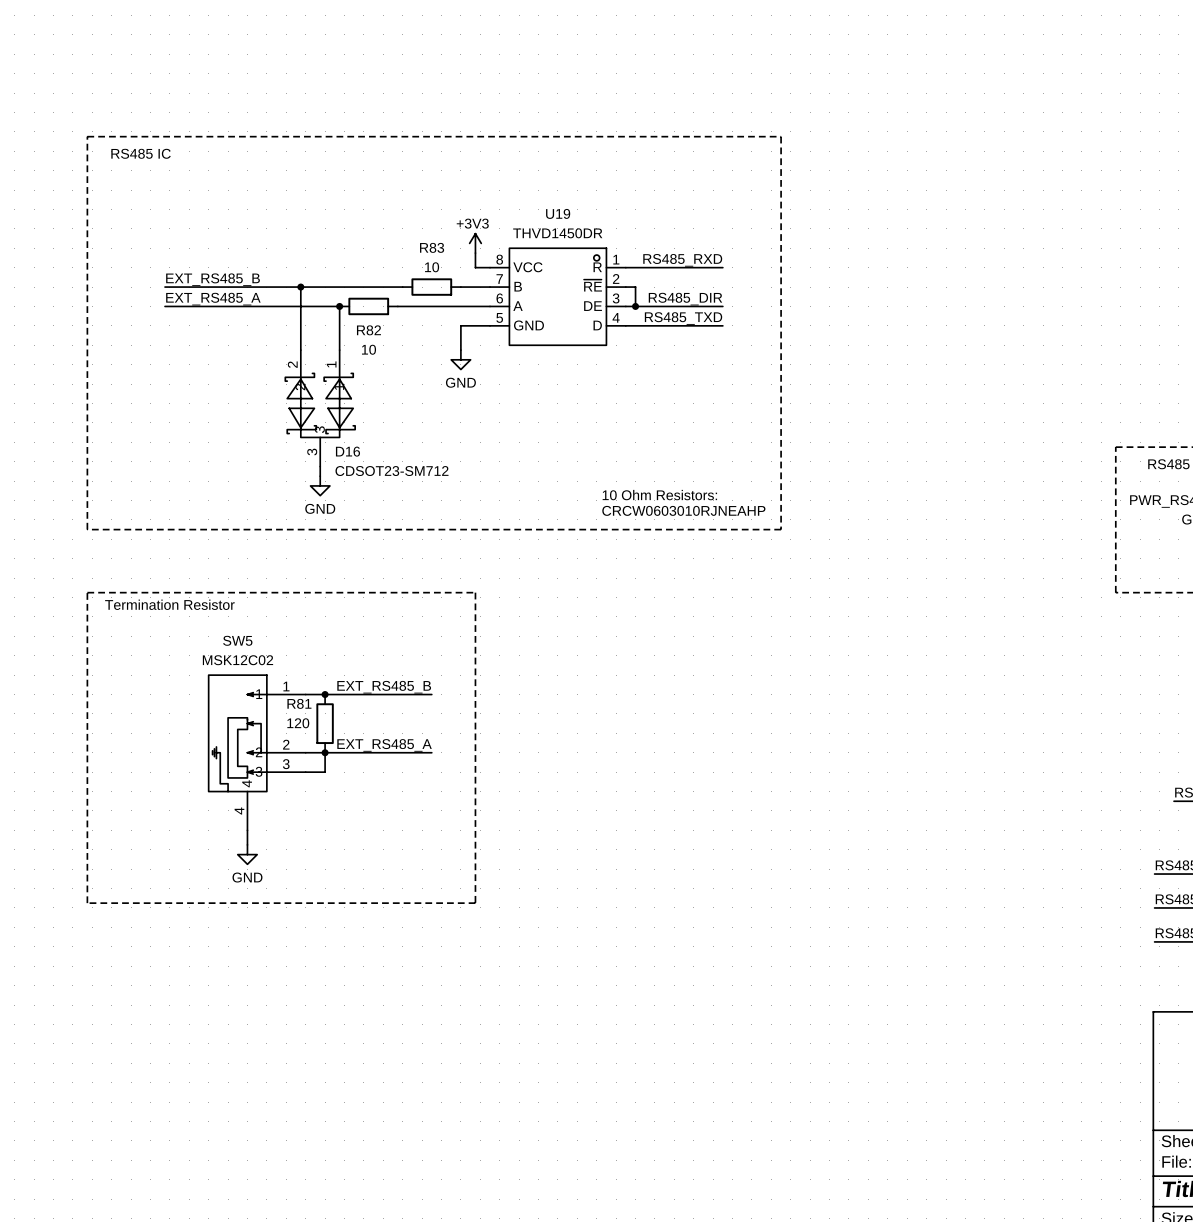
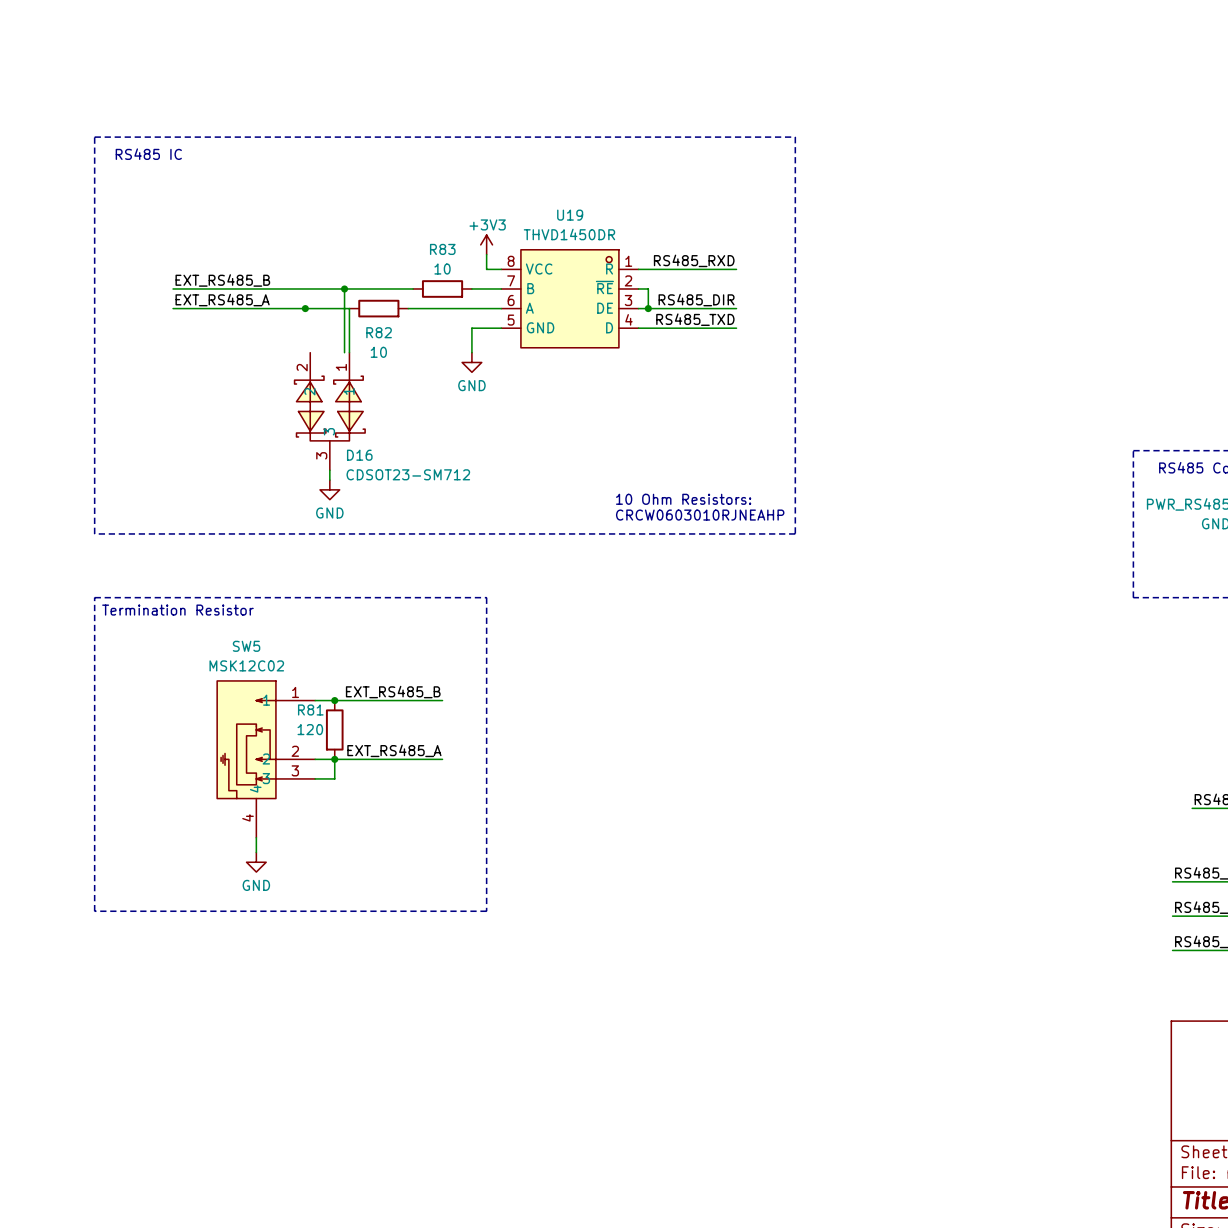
wire: (300, 287) (300, 350) -> (344, 288) (344, 352)
junction: (300, 287) -> none
junction: none -> (344, 288)
junction: none -> (305, 308)
junction: (339, 306) -> none

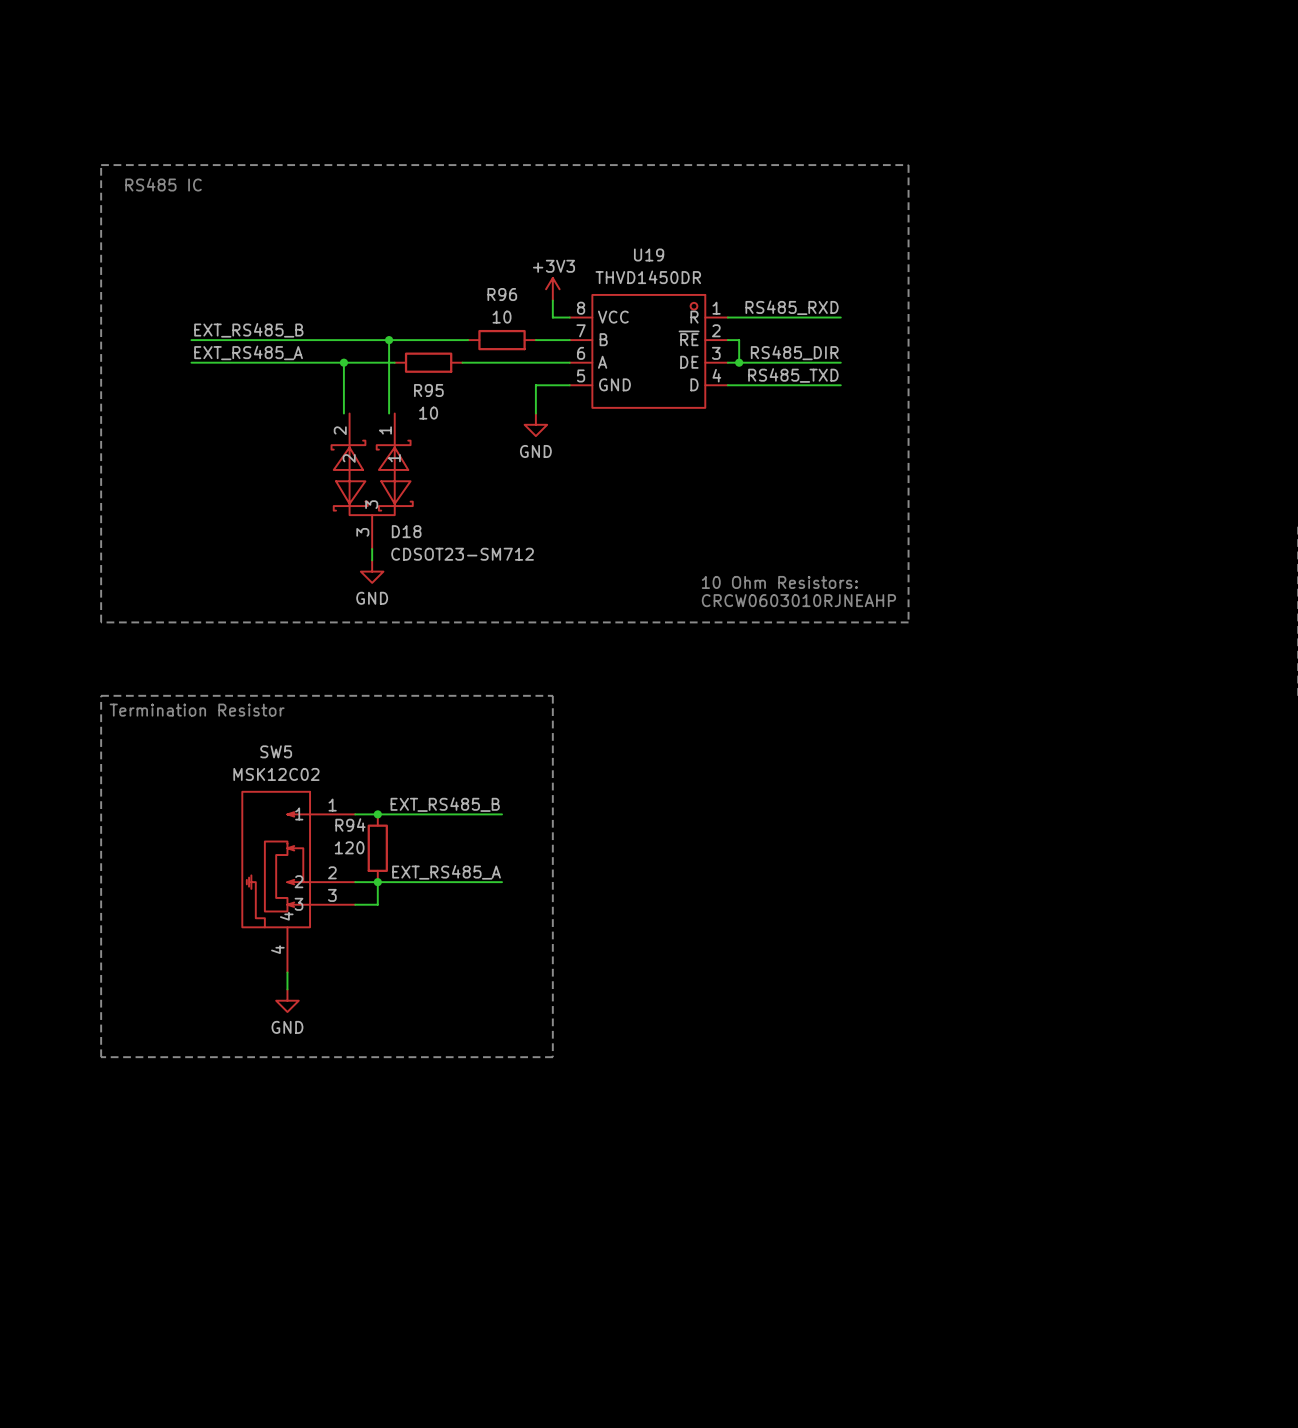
R83 name: R83 (442, 249) -> R96 (502, 294)
wire: (349, 308) (349, 352) -> (343, 362) (343, 413)
R82 name: R82 (379, 332) -> R95 (428, 390)
D16 name: D16 (359, 455) -> D18 (406, 531)
R81 name: R81 (310, 709) -> R94 (350, 824)

